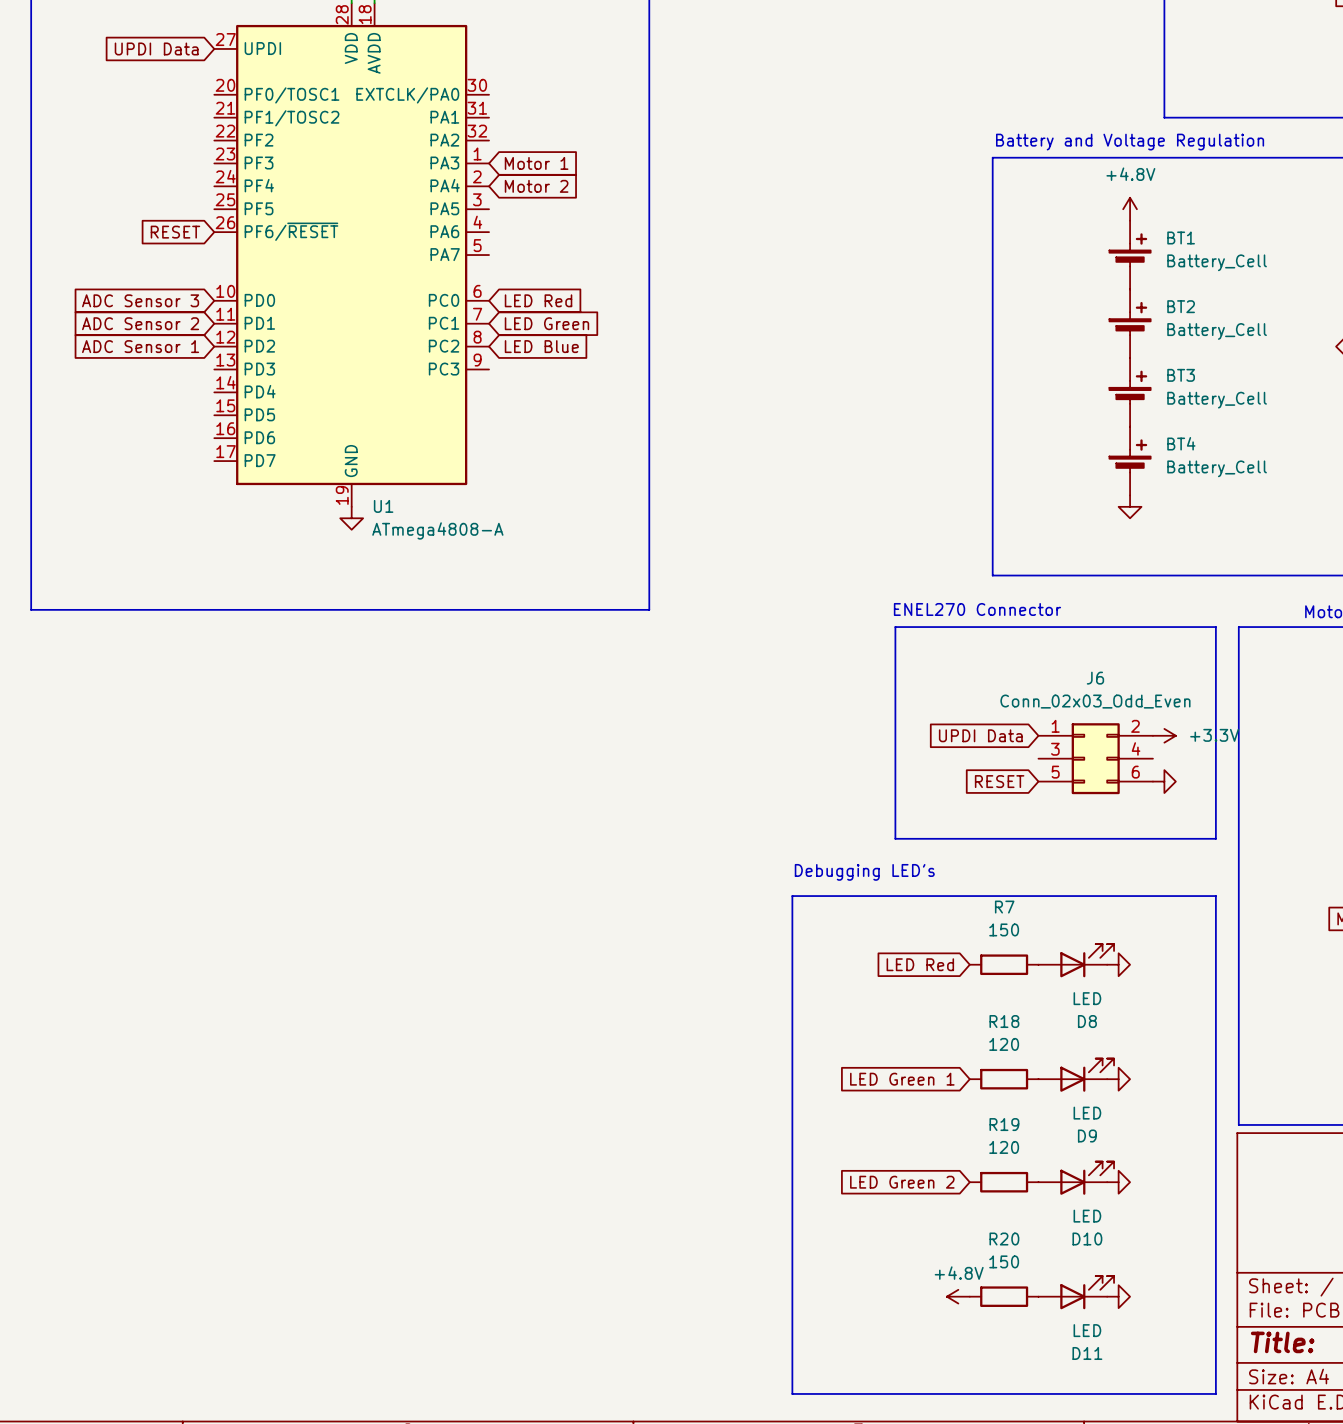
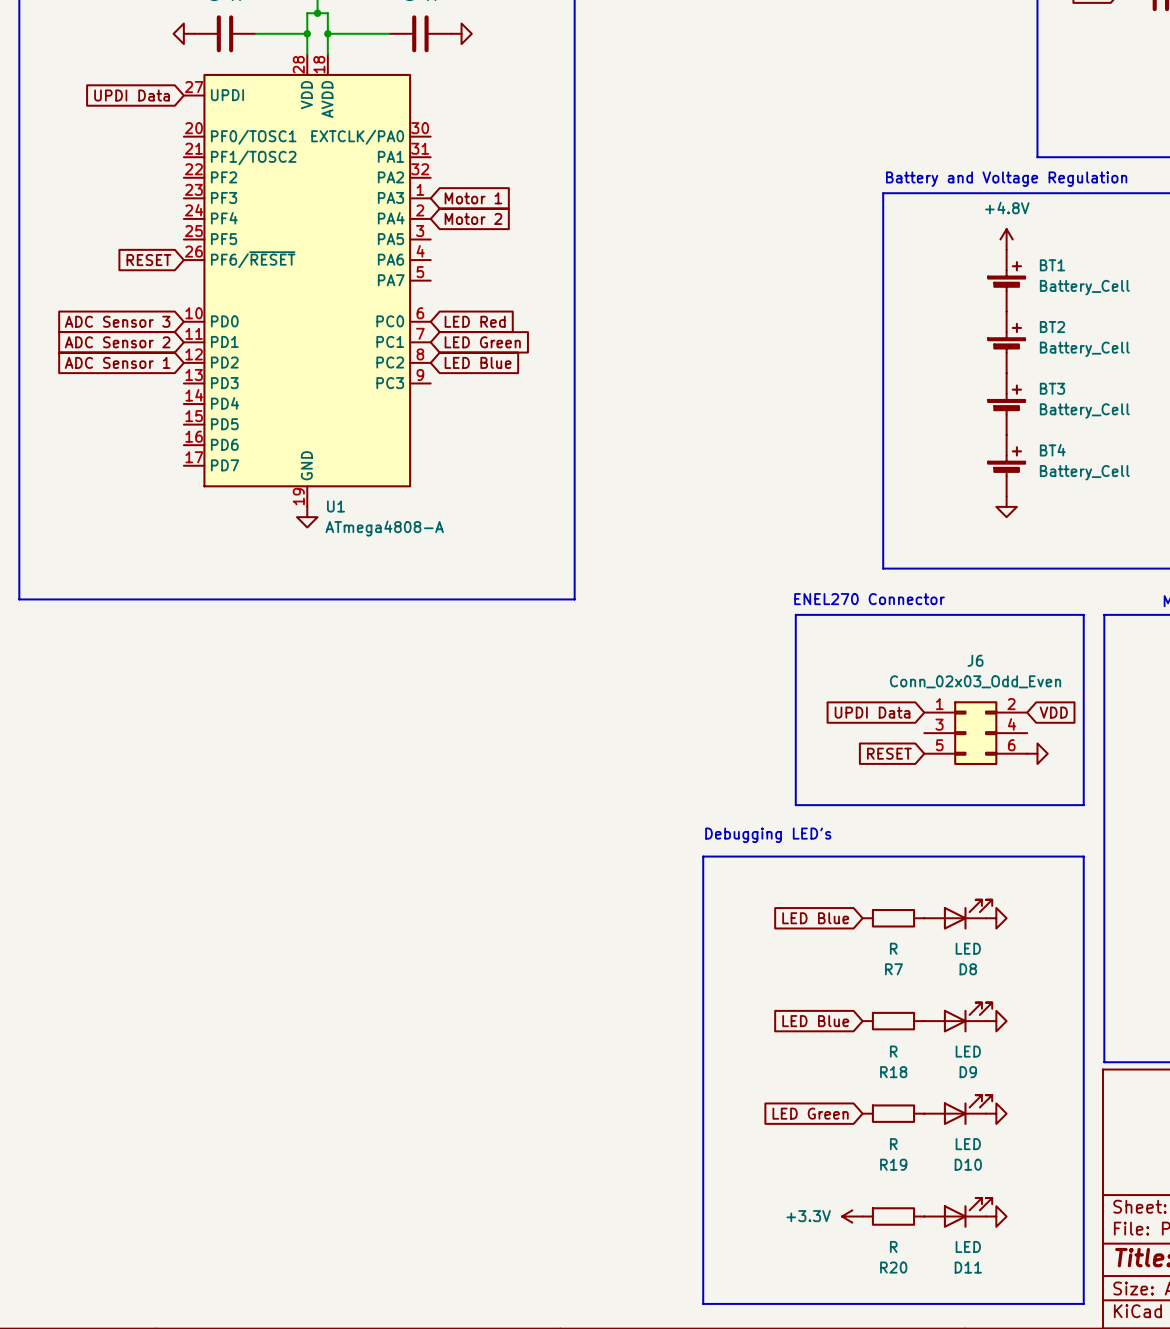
power symbol: +3.3V (1164, 735) -> none
global label: none -> VDD (1053, 712)
R7 name position: R7 (1004, 907) -> R7 (893, 969)
R7 value: 150 (1004, 929) -> R (893, 948)
global label: LED Red (920, 964) -> LED Blue (815, 918)
R18 name position: R18 (1004, 1021) -> R18 (893, 1072)
R18 value: 120 (1004, 1044) -> R (893, 1051)
global label: LED Green 1 (902, 1079) -> LED Blue (815, 1021)
R19 name position: R19 (1004, 1124) -> R19 (893, 1164)
R19 value: 120 (1004, 1147) -> R (893, 1144)
global label: LED Green 2 (902, 1182) -> LED Green (810, 1113)
R20 name position: R20 (1004, 1239) -> R20 (893, 1267)
R20 value: 150 (1004, 1261) -> R (893, 1246)
power symbol: +4.8V (958, 1296) -> +3.3V (852, 1216)

